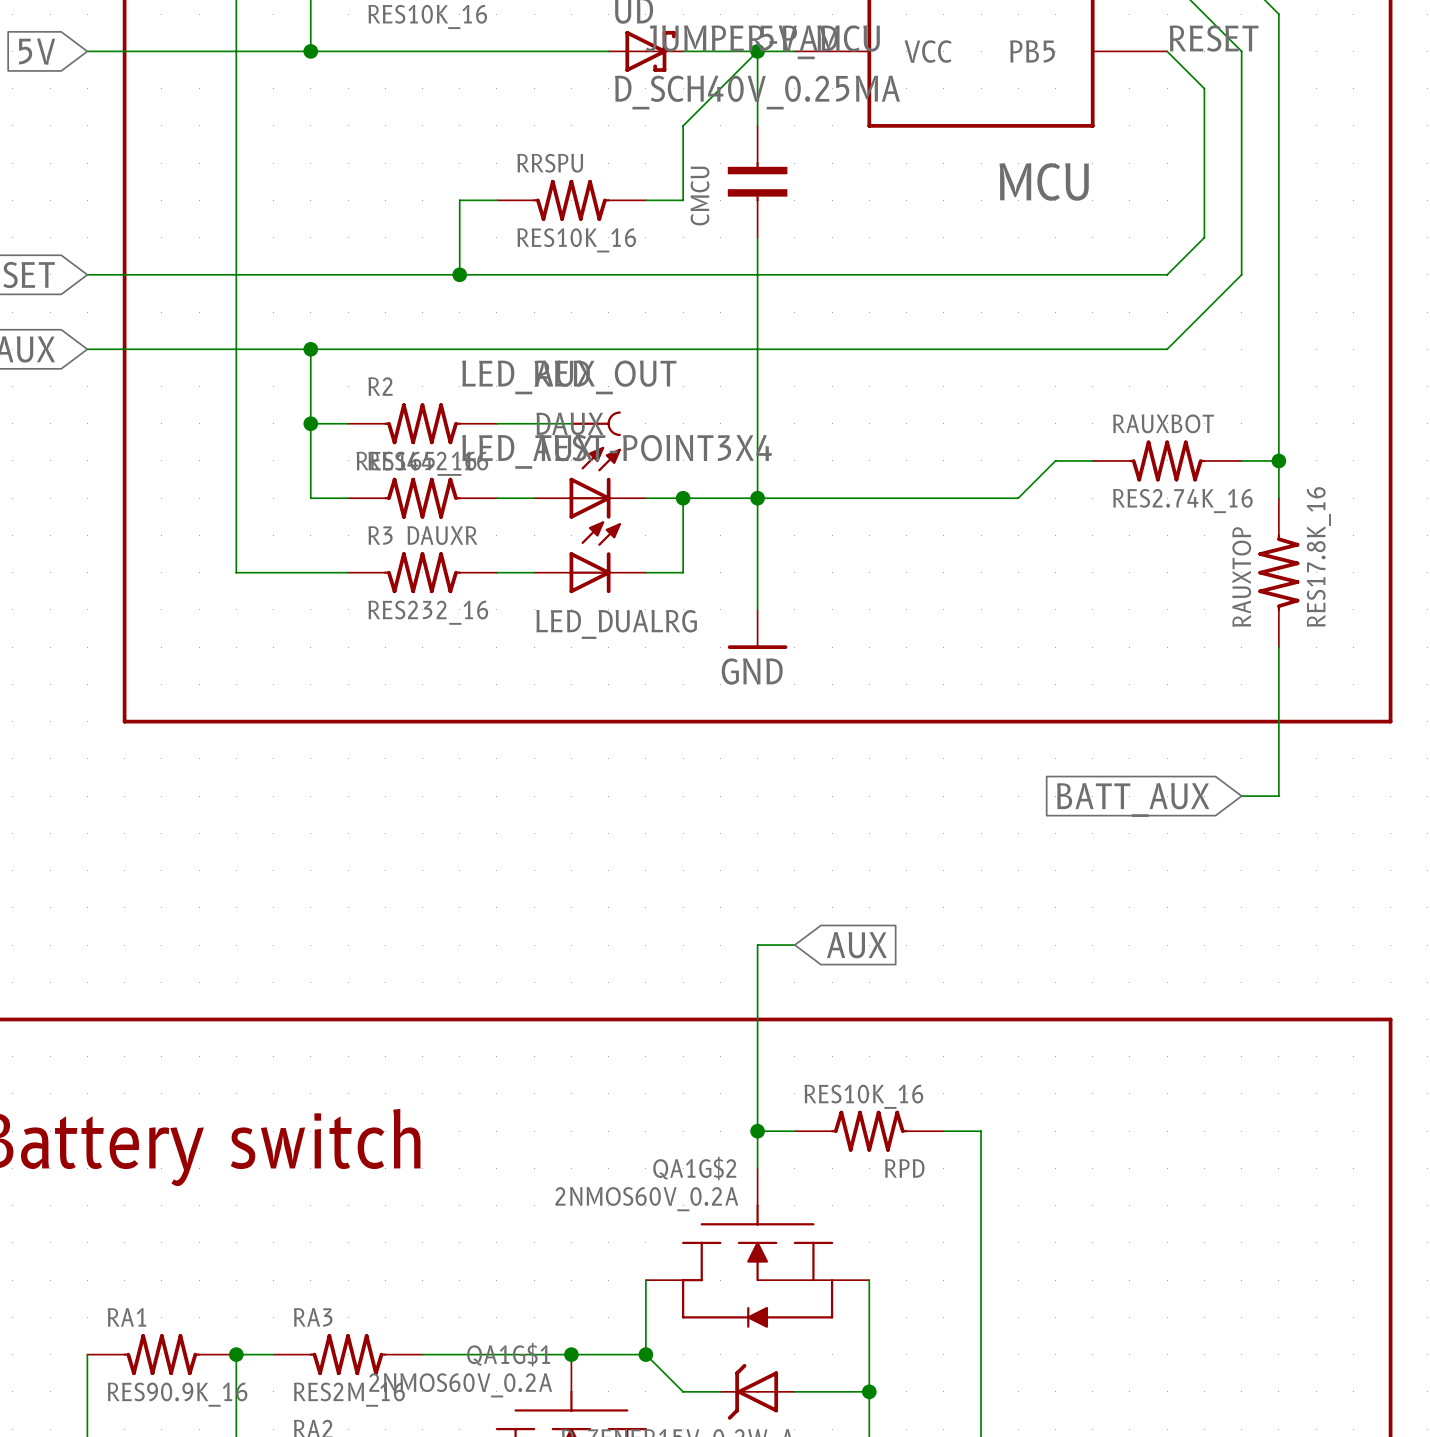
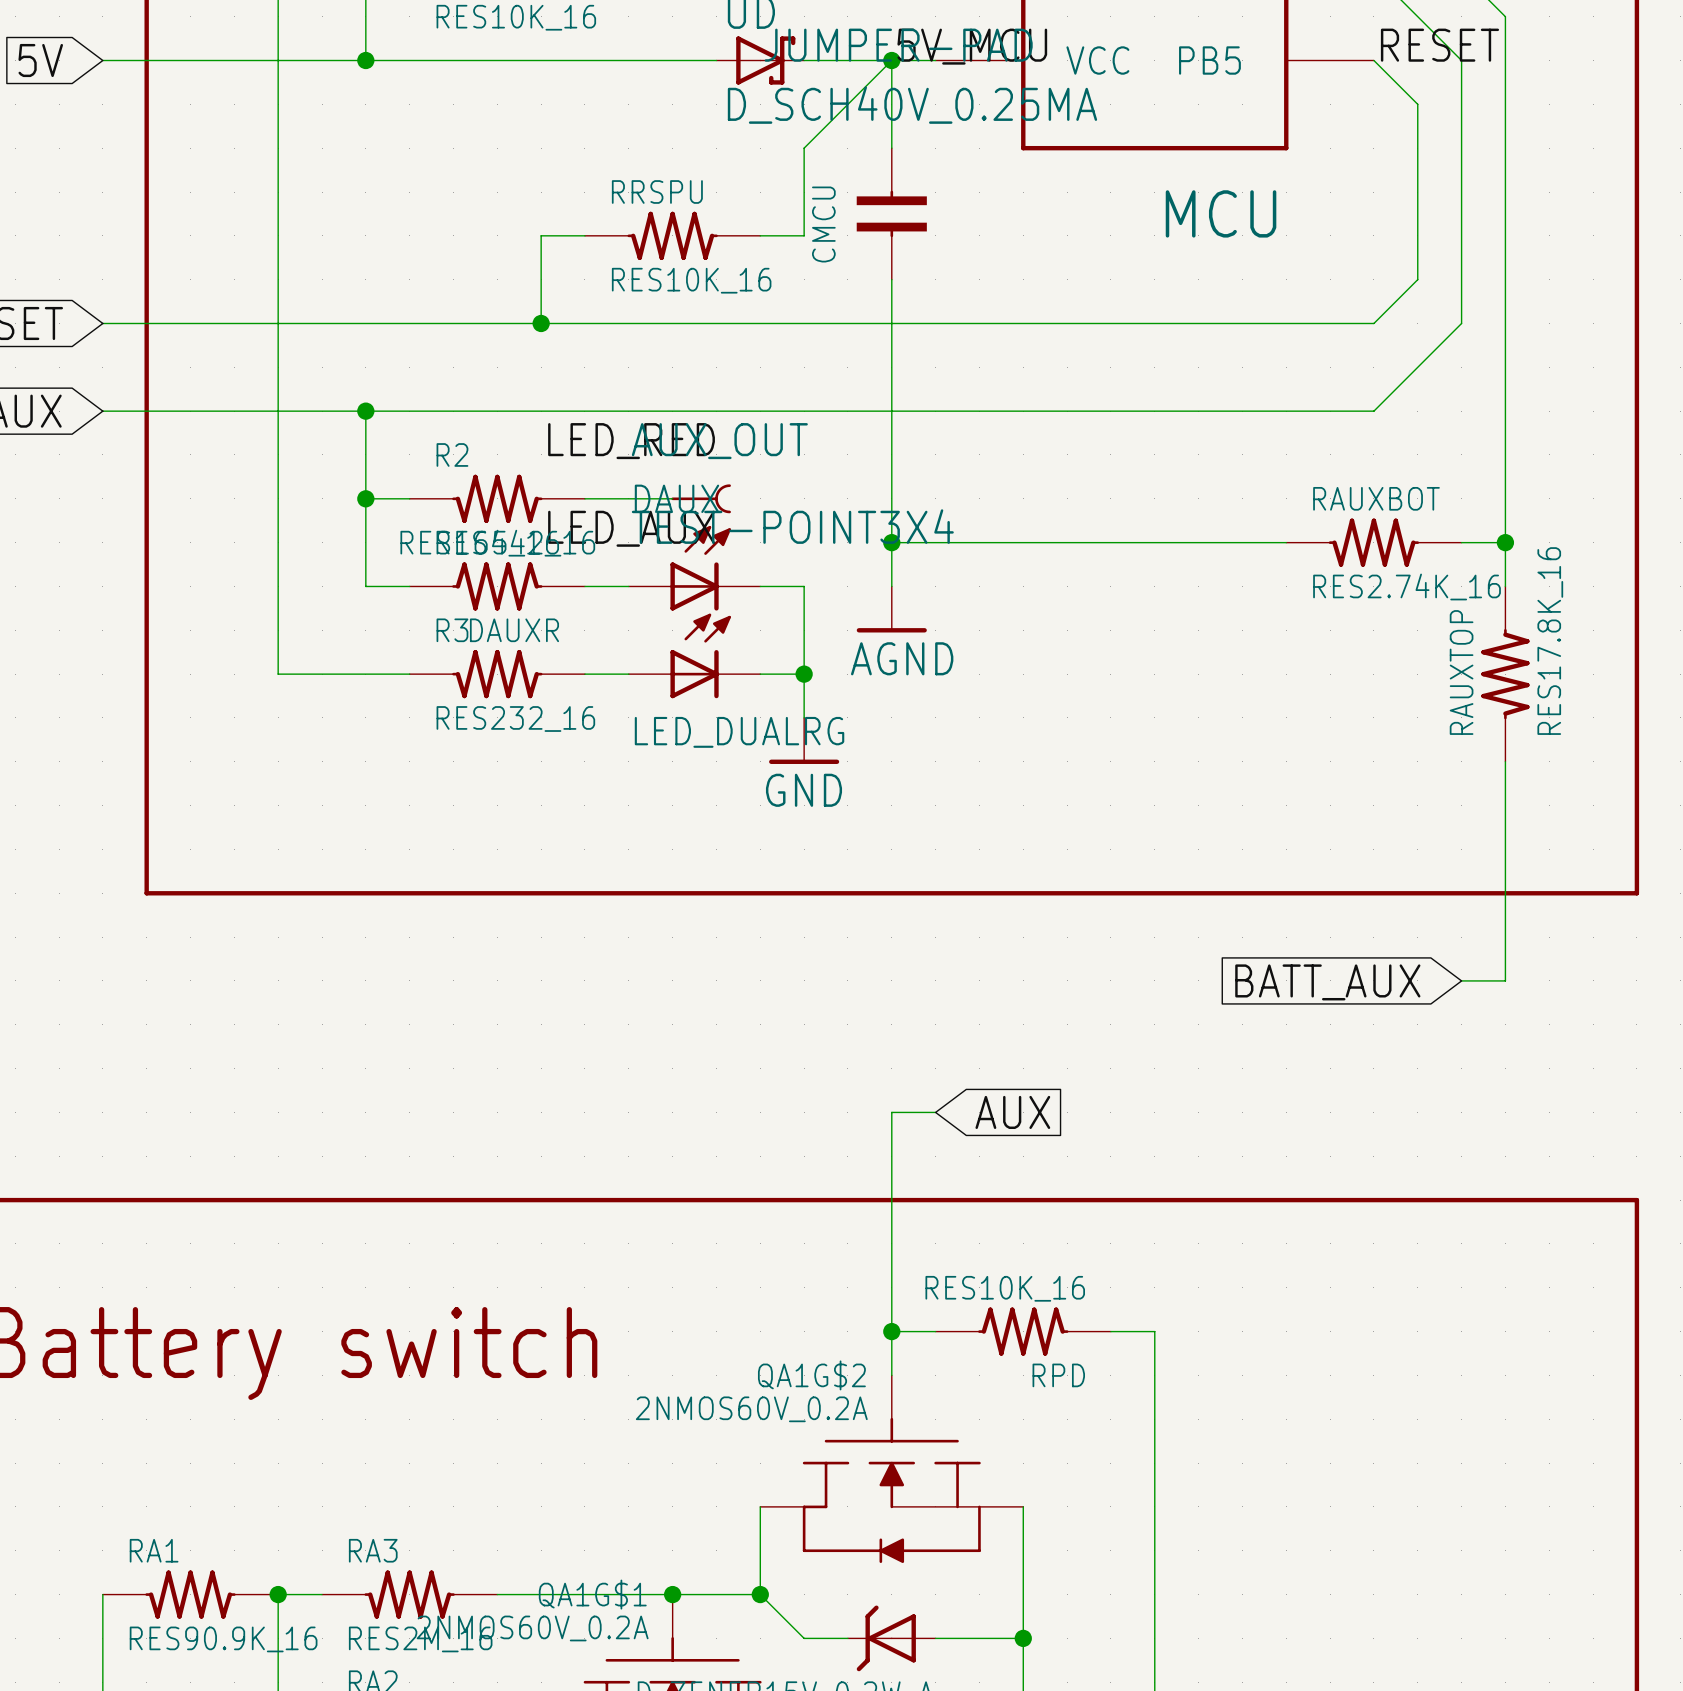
wire: (1055, 460) (1018, 498) (683, 498) -> (1242, 542) (891, 542)
junction: (683, 498) -> none
wire: (757, 498) (757, 609) -> none
junction position: (757, 498) -> (891, 542)
power symbol: none -> AGND (891, 609)
wire: none -> (804, 674) (804, 717)
junction: none -> (804, 674)
power symbol position: GND (757, 629) -> GND (804, 740)
line: (124, 721) (1390, 721) -> (146, 849) (146, 893) (1636, 893) (1636, 849)
wire: (1241, 796) (1278, 796) -> (1461, 980) (1505, 980) (1505, 937)
global label position: BATT_AUX (1133, 799) -> BATT_AUX (1327, 982)

